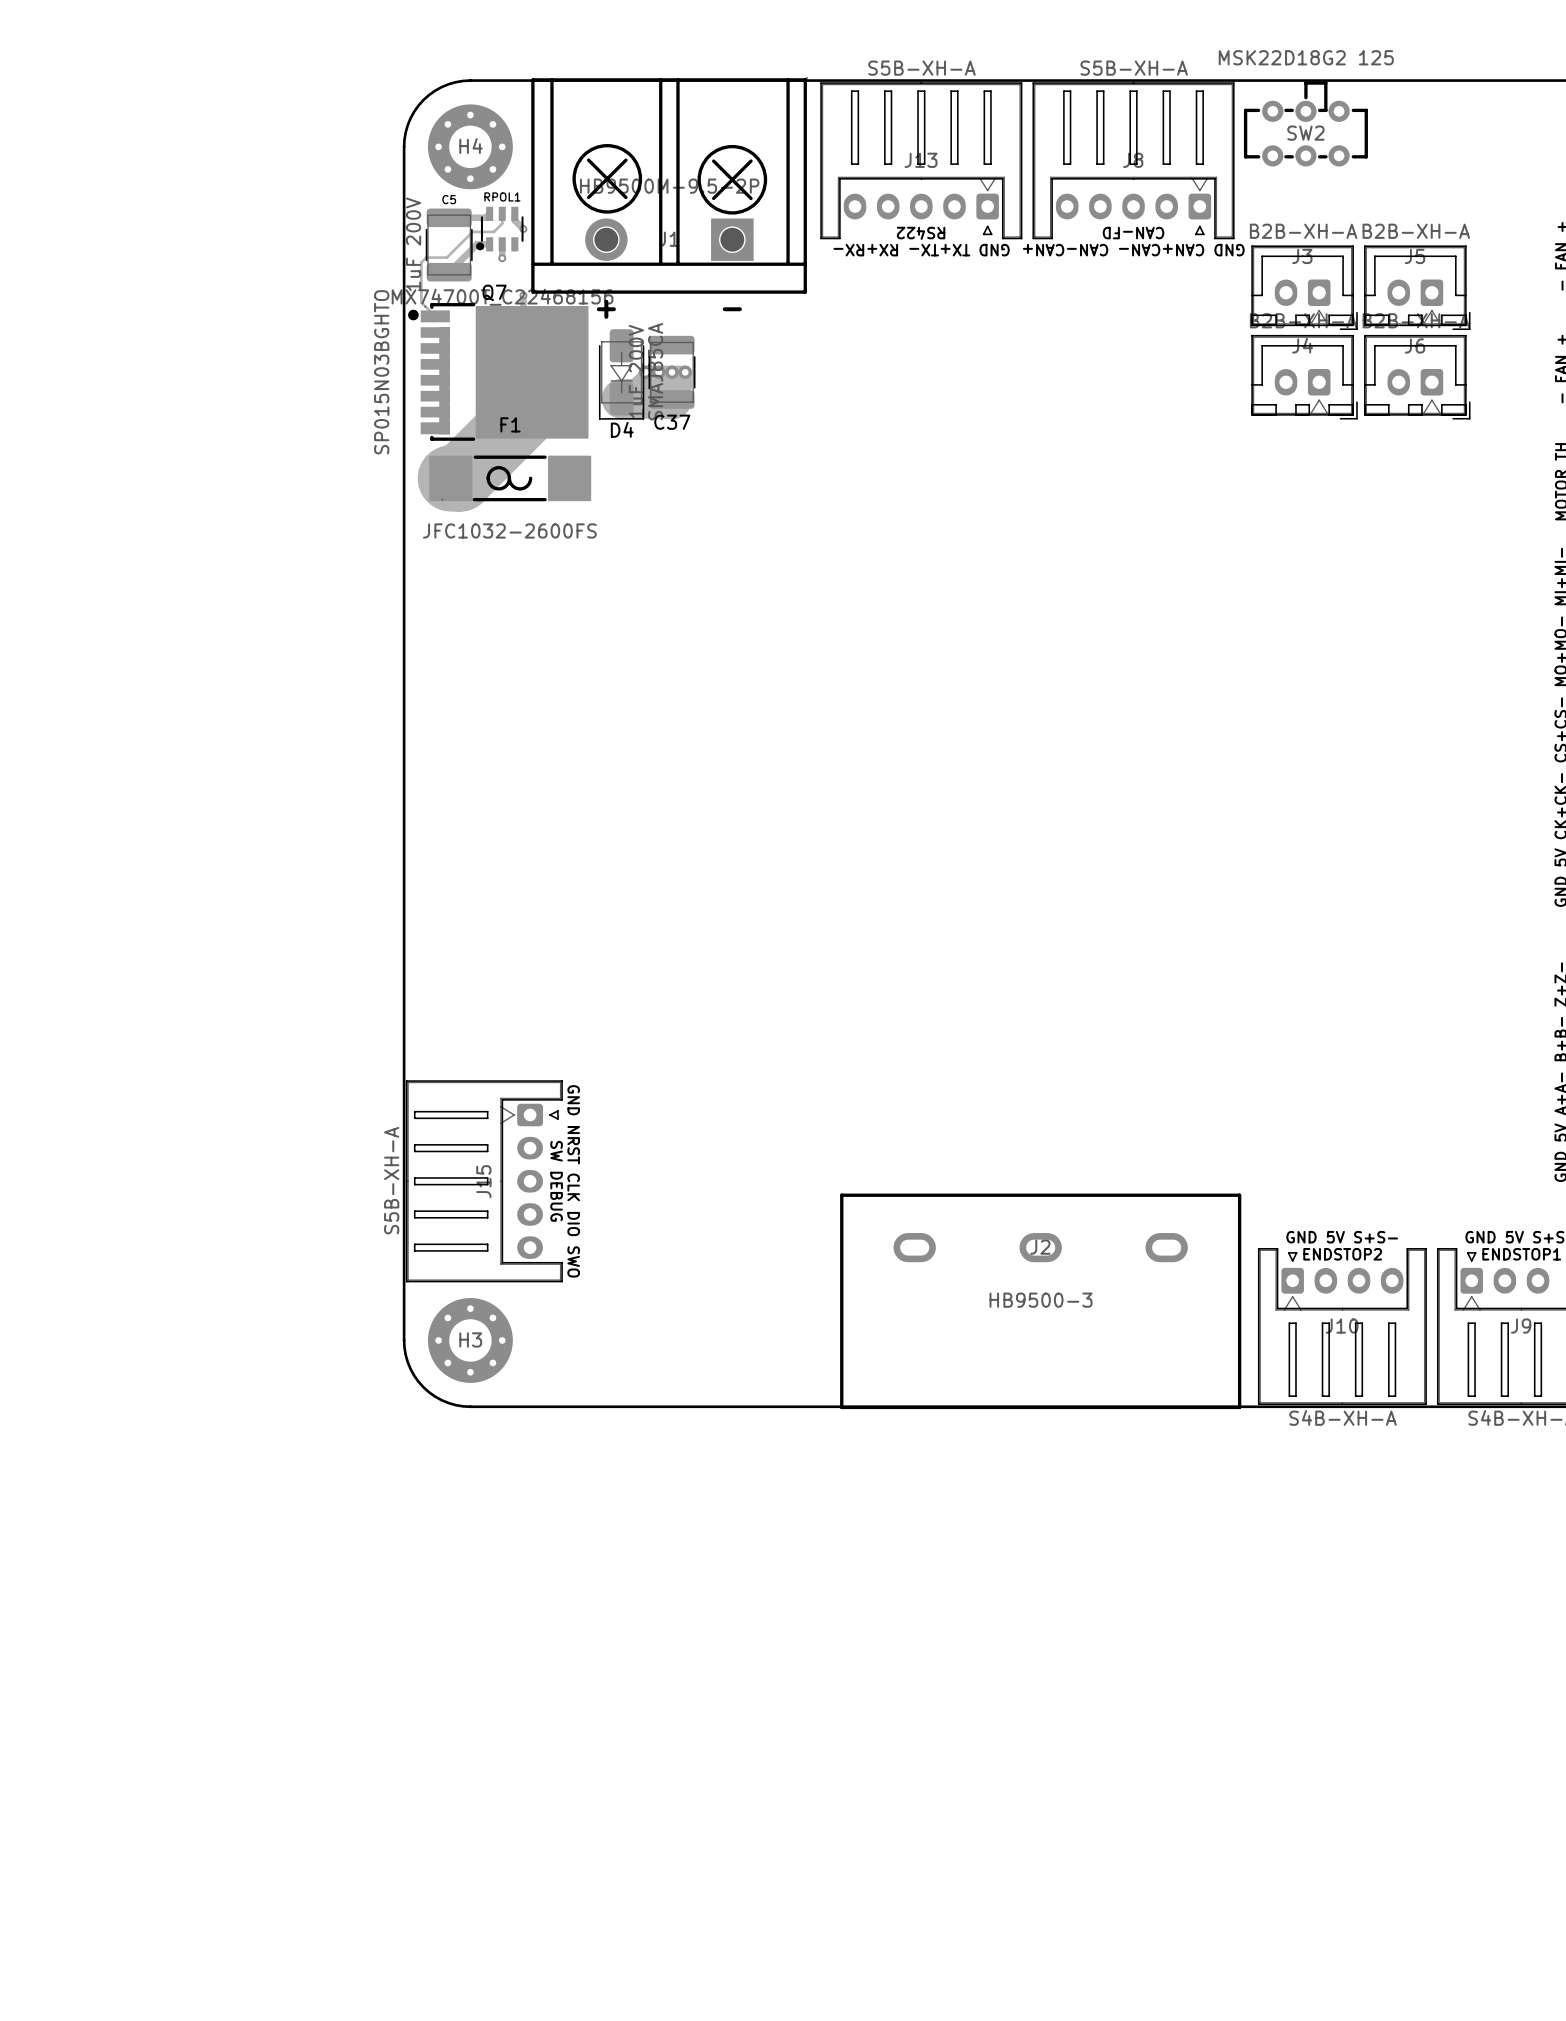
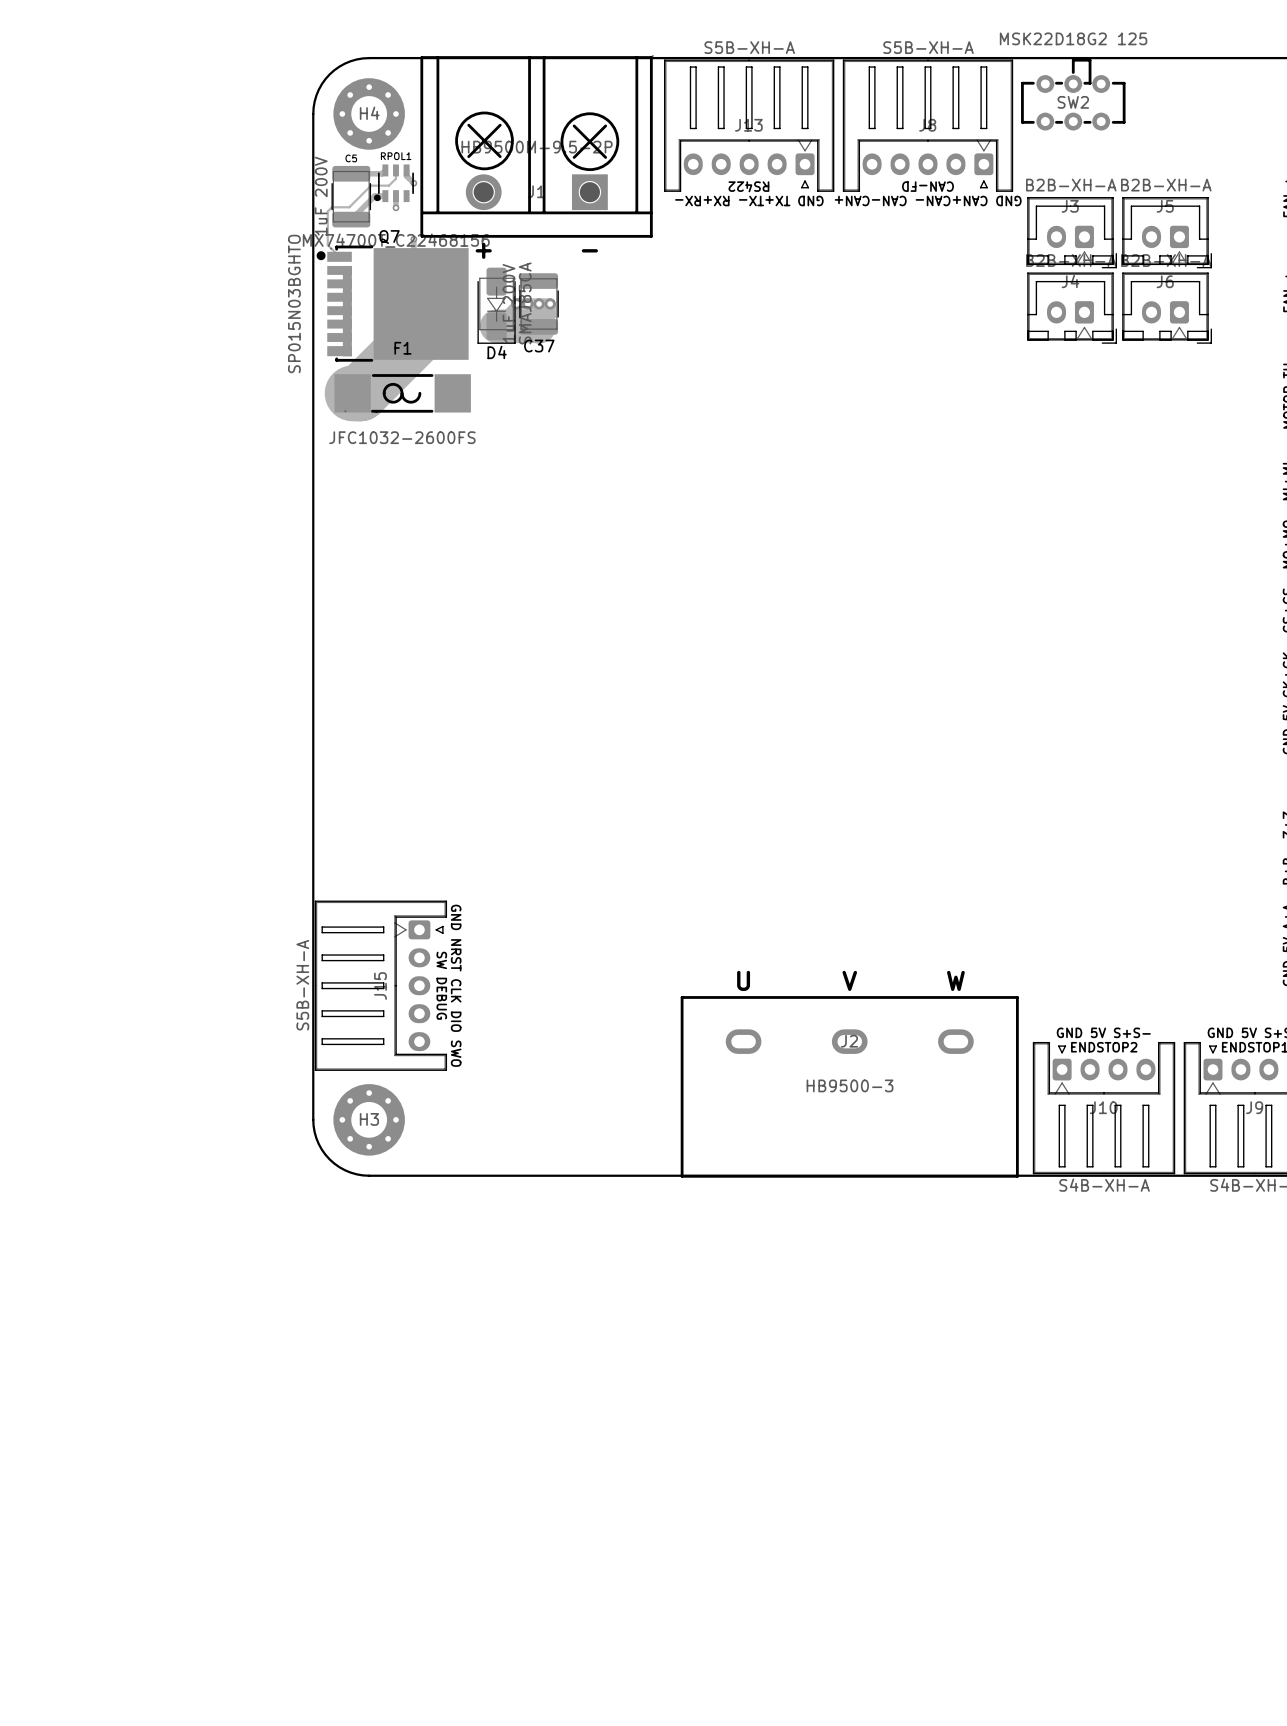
text: none -> U (743, 980)
text: none -> V (849, 980)
text: none -> W (955, 980)

